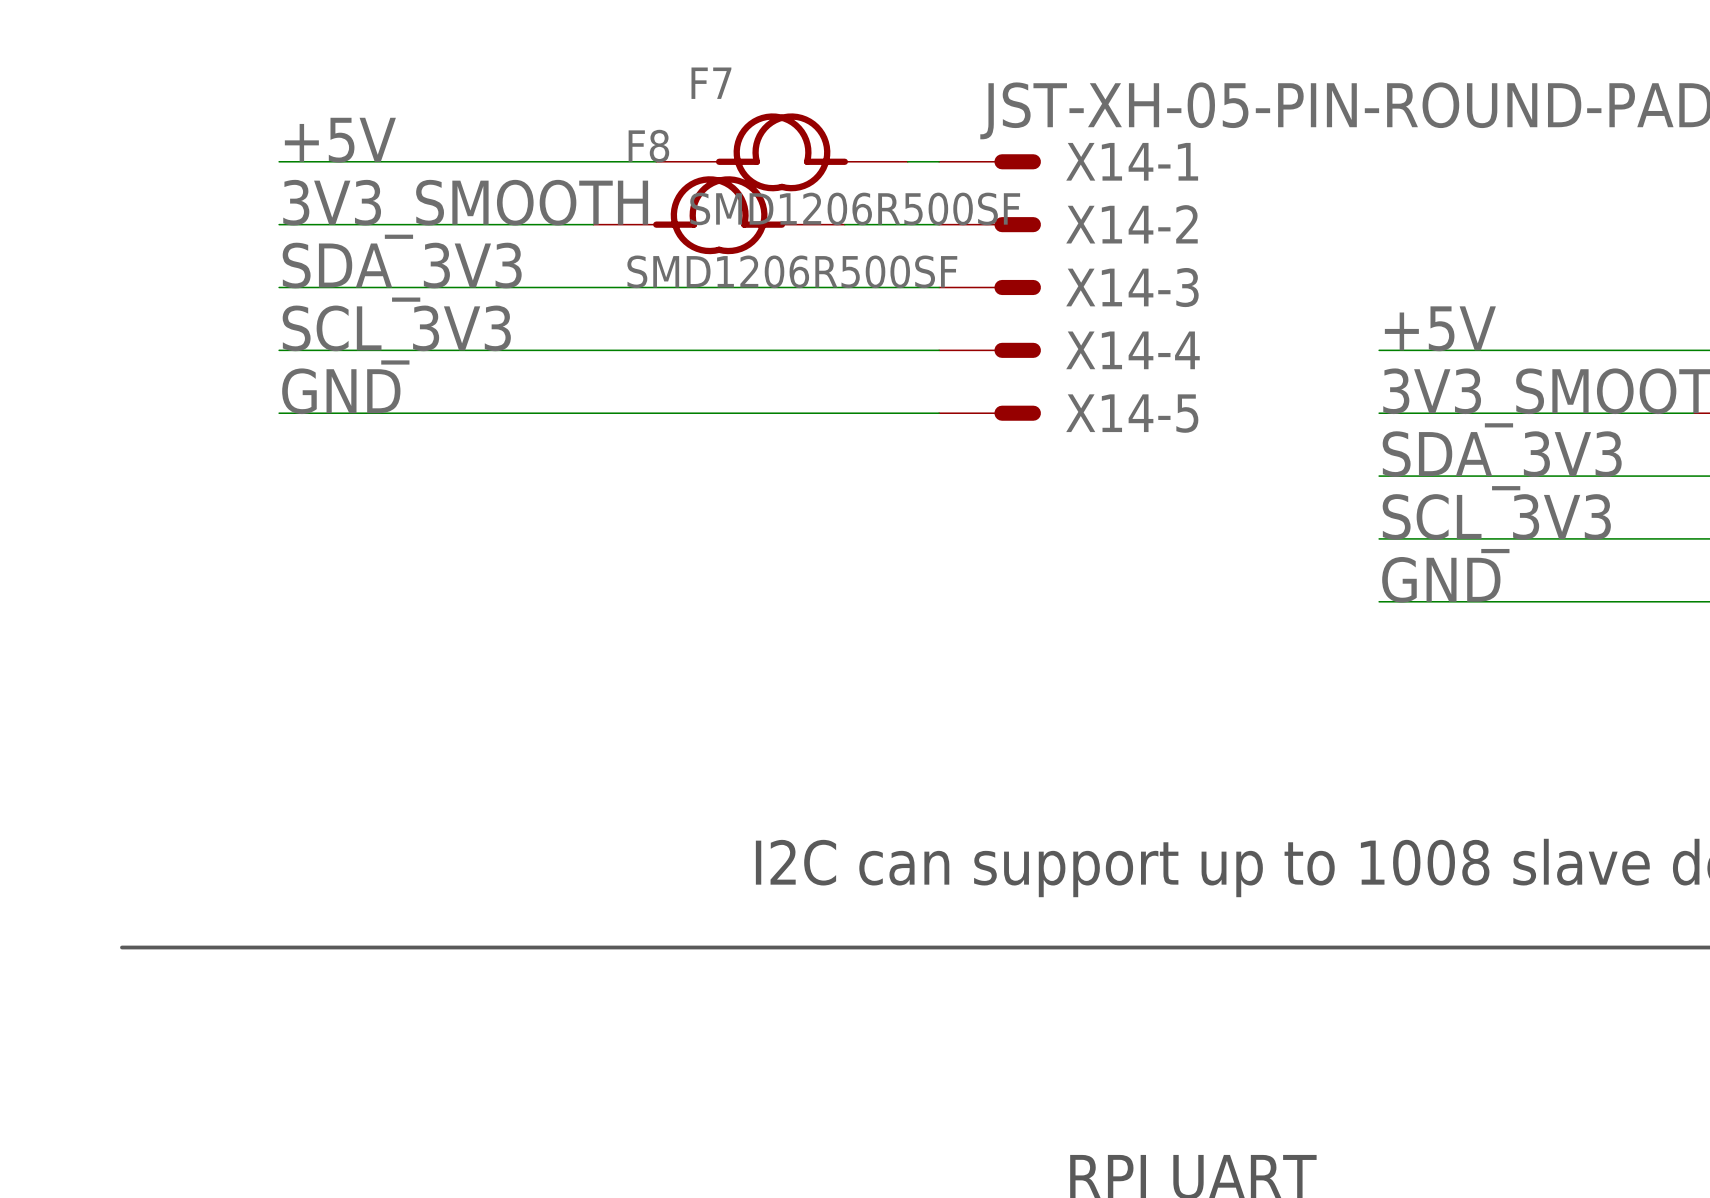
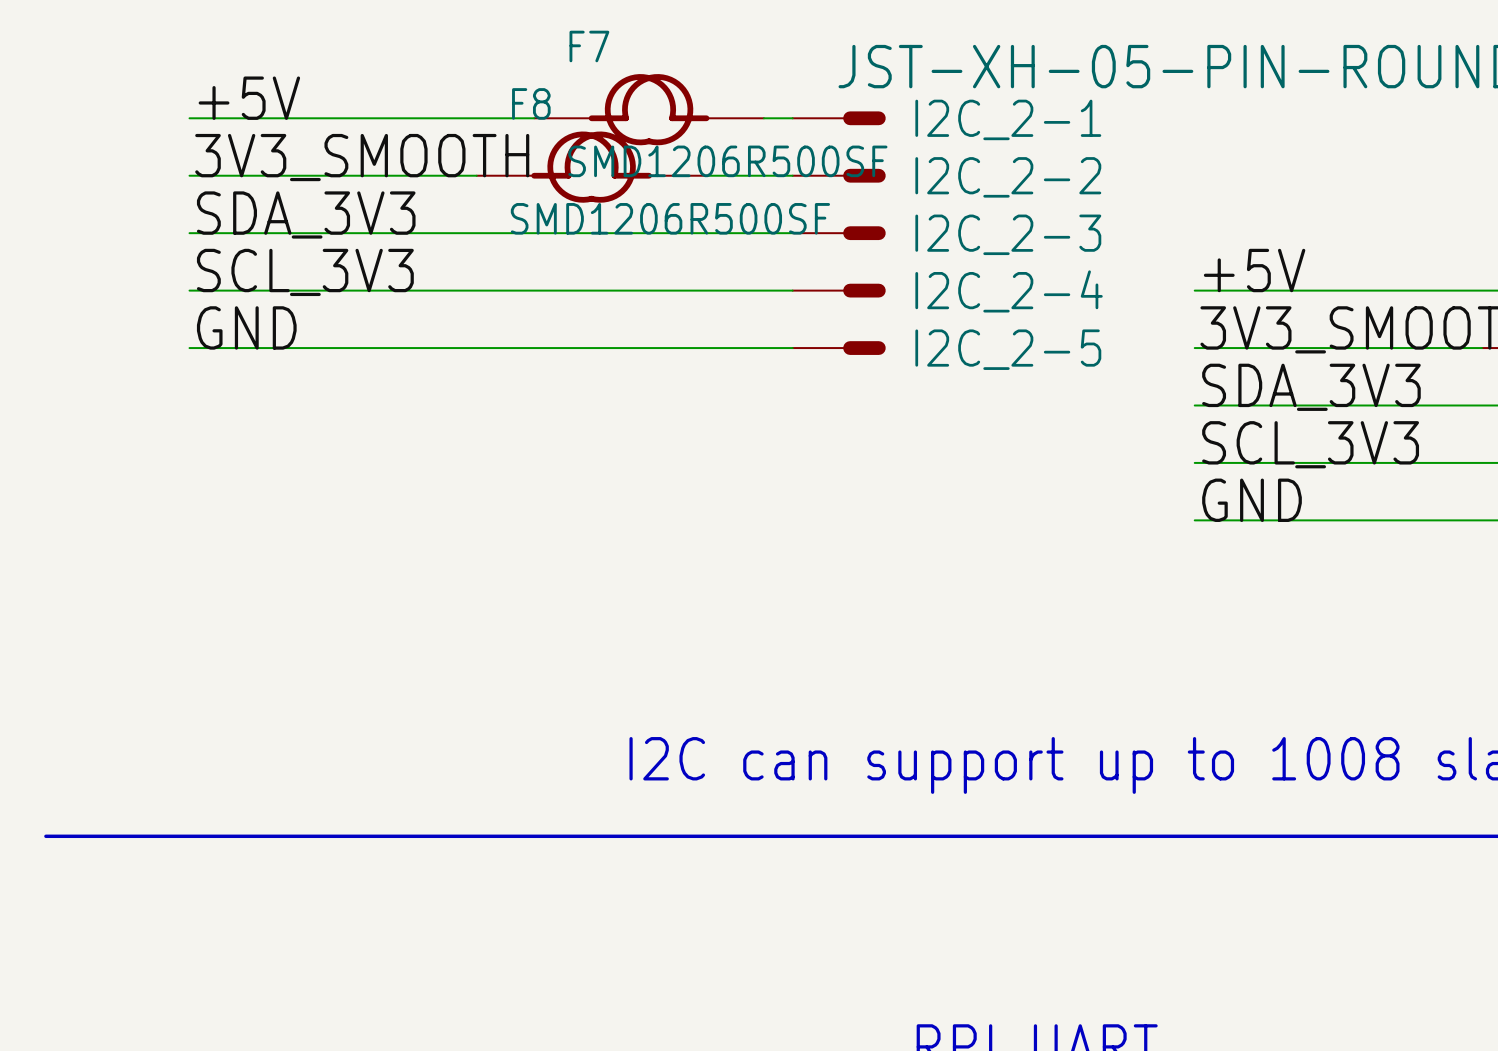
X14-1 name: X14-1 (1132, 161) -> I2C_2-1 (1008, 119)
X14-2 name: X14-2 (1131, 224) -> I2C_2-2 (1008, 177)
X14-3 name: X14-3 (1132, 287) -> I2C_2-3 (1008, 234)
X14-4 name: X14-4 (1133, 350) -> I2C_2-4 (1009, 291)
X14-5 name: X14-5 (1132, 413) -> I2C_2-5 (1008, 349)

